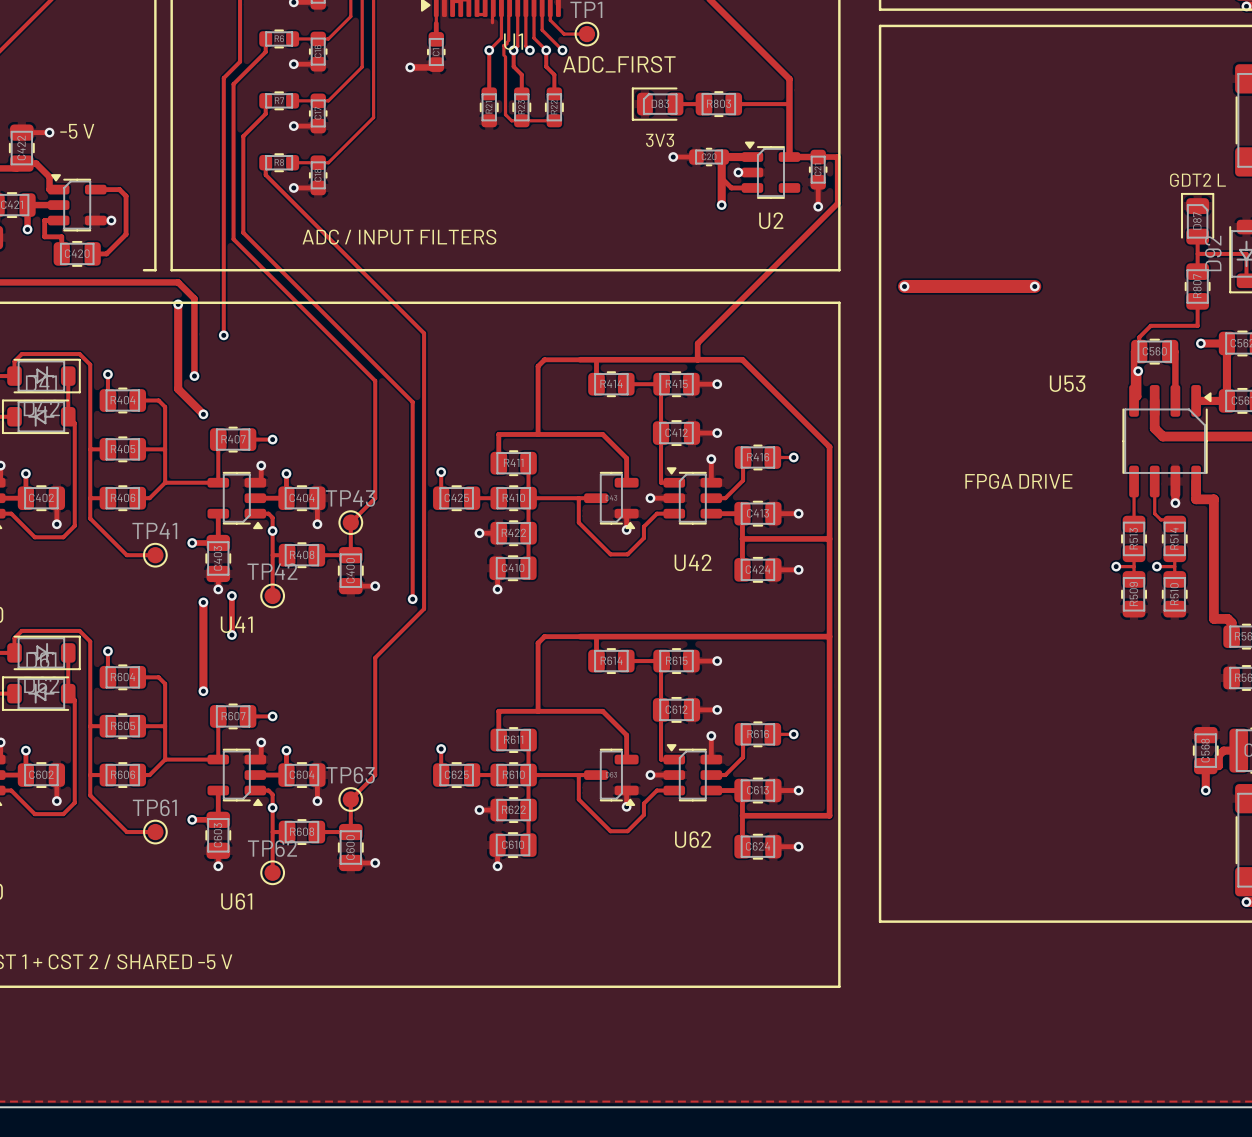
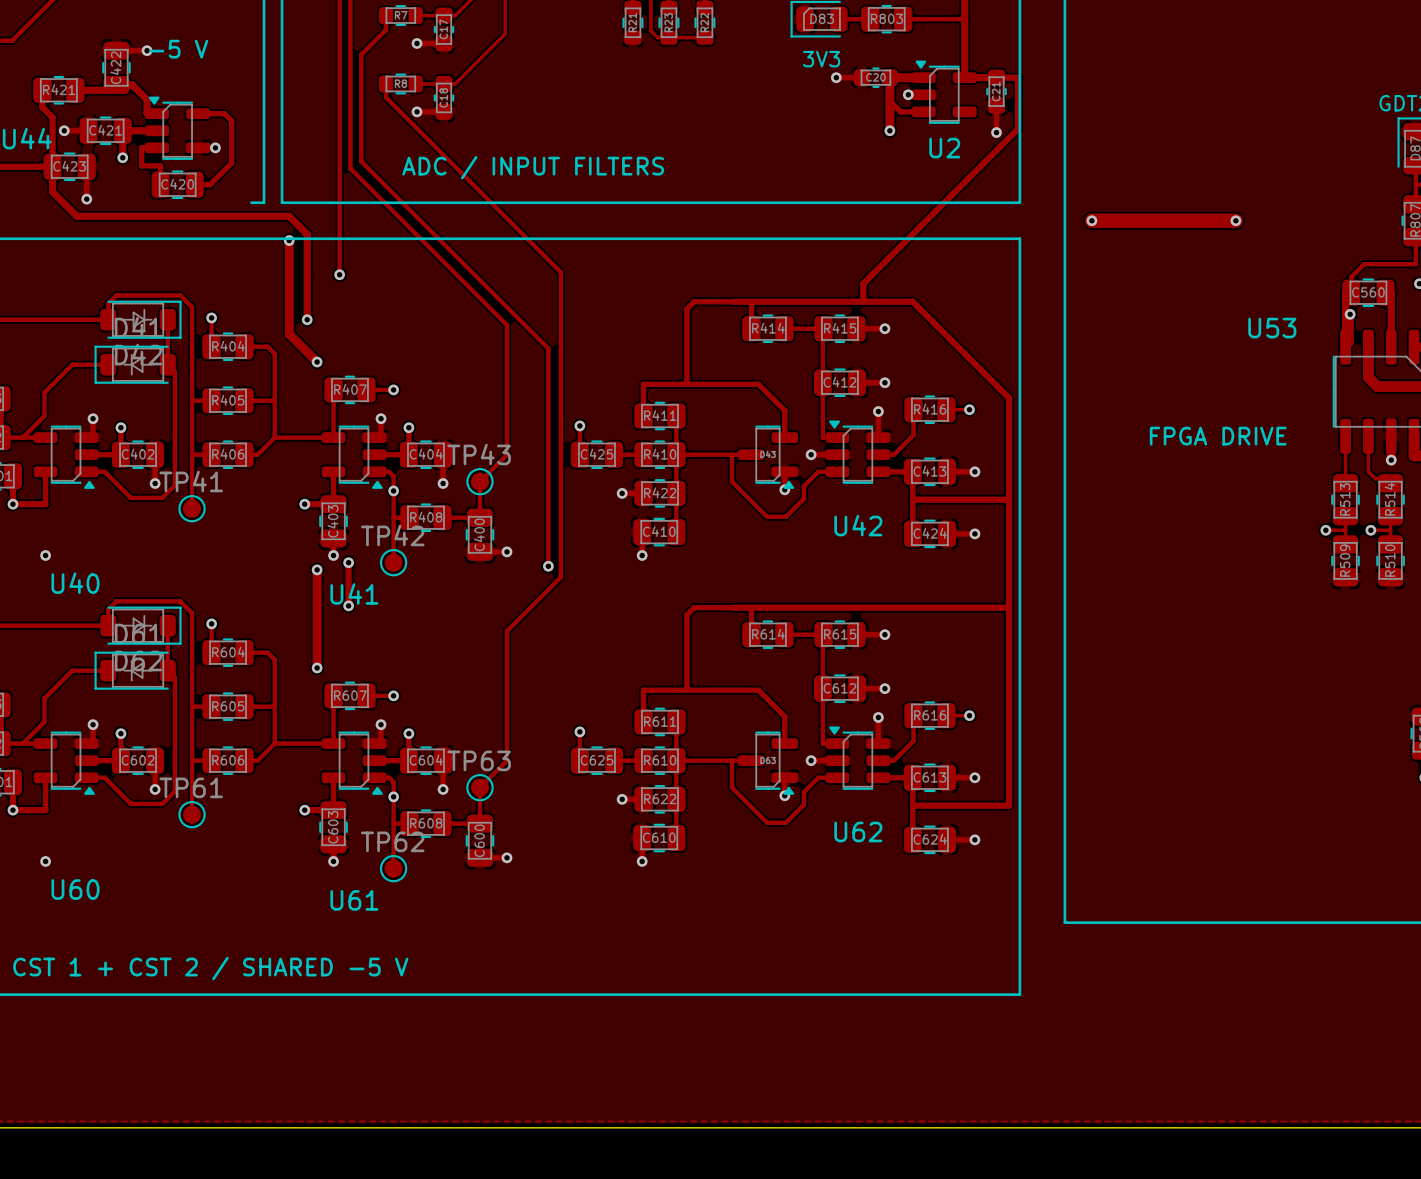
track: (90, 518) (126, 555) (155, 555) -> (192, 477) (192, 508)
TP41 position: (155, 555) -> (192, 508)
track: (90, 795) (126, 832) (155, 832) -> (192, 783) (192, 814)
TP61 position: (155, 832) -> (192, 814)

